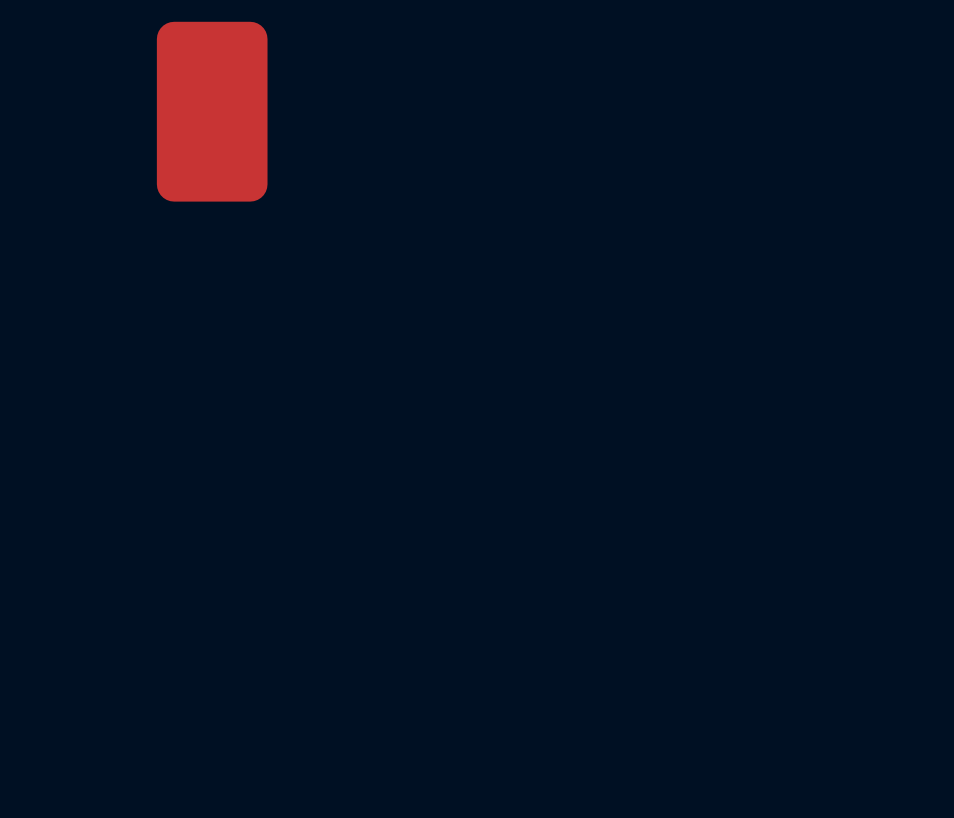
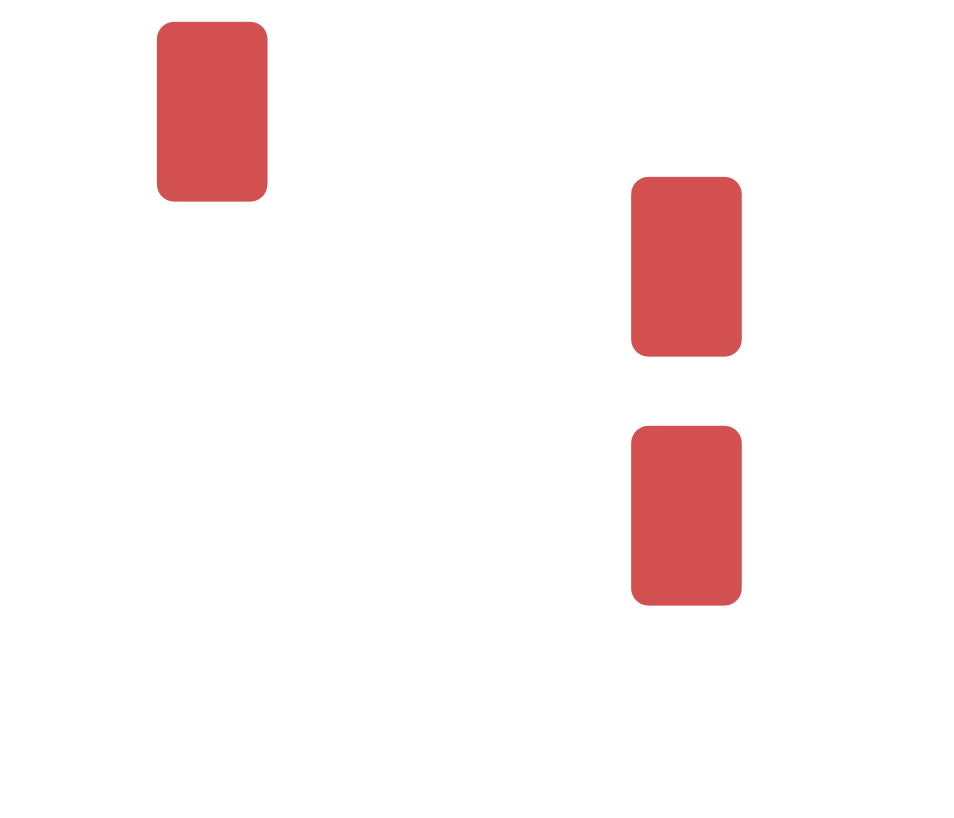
part: none -> (686, 391)

